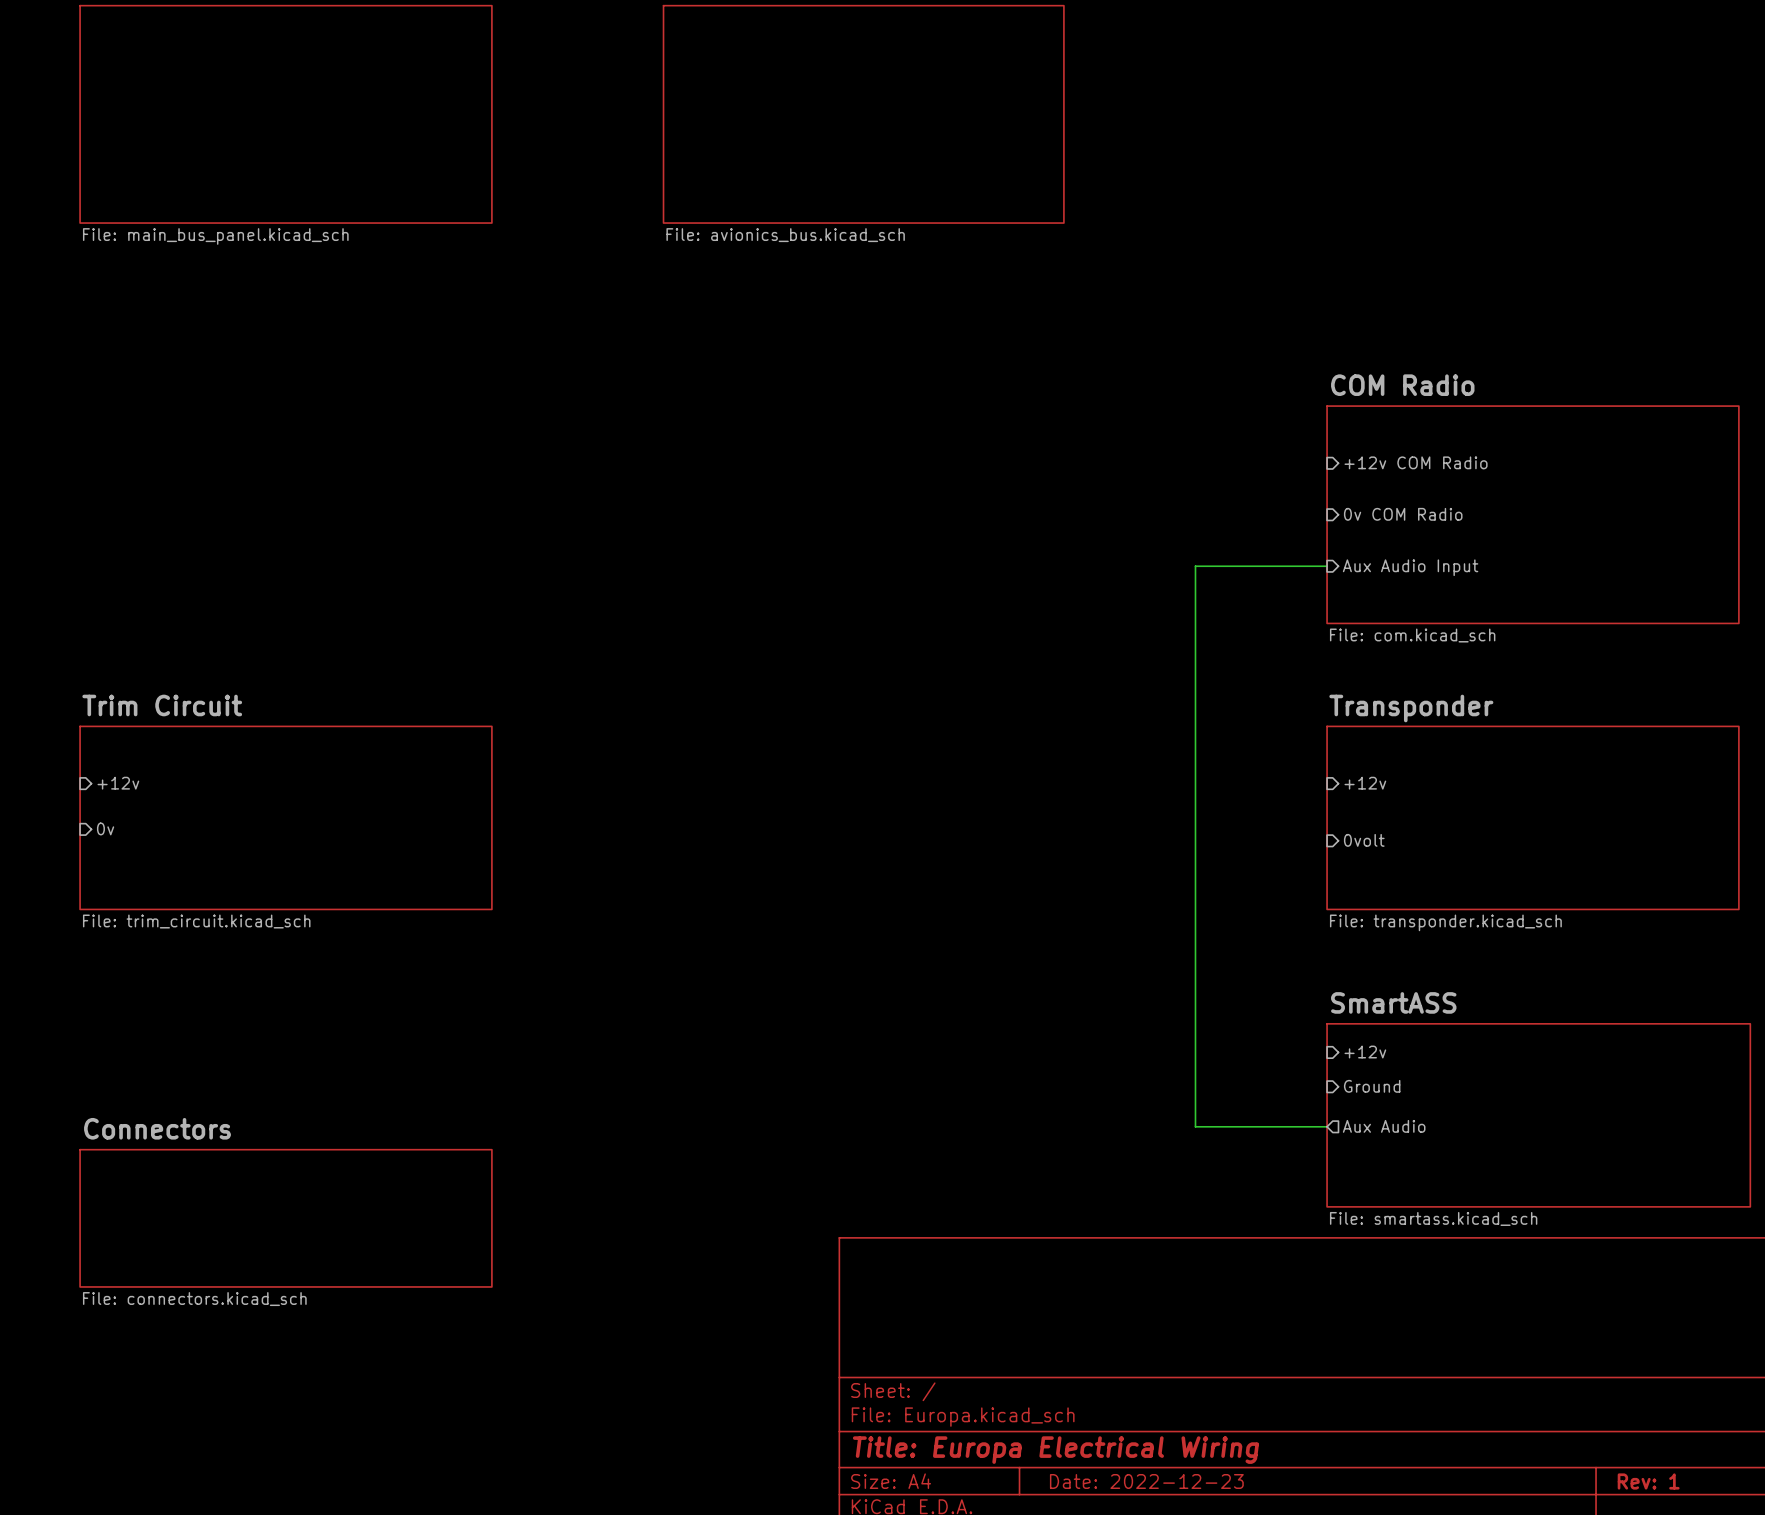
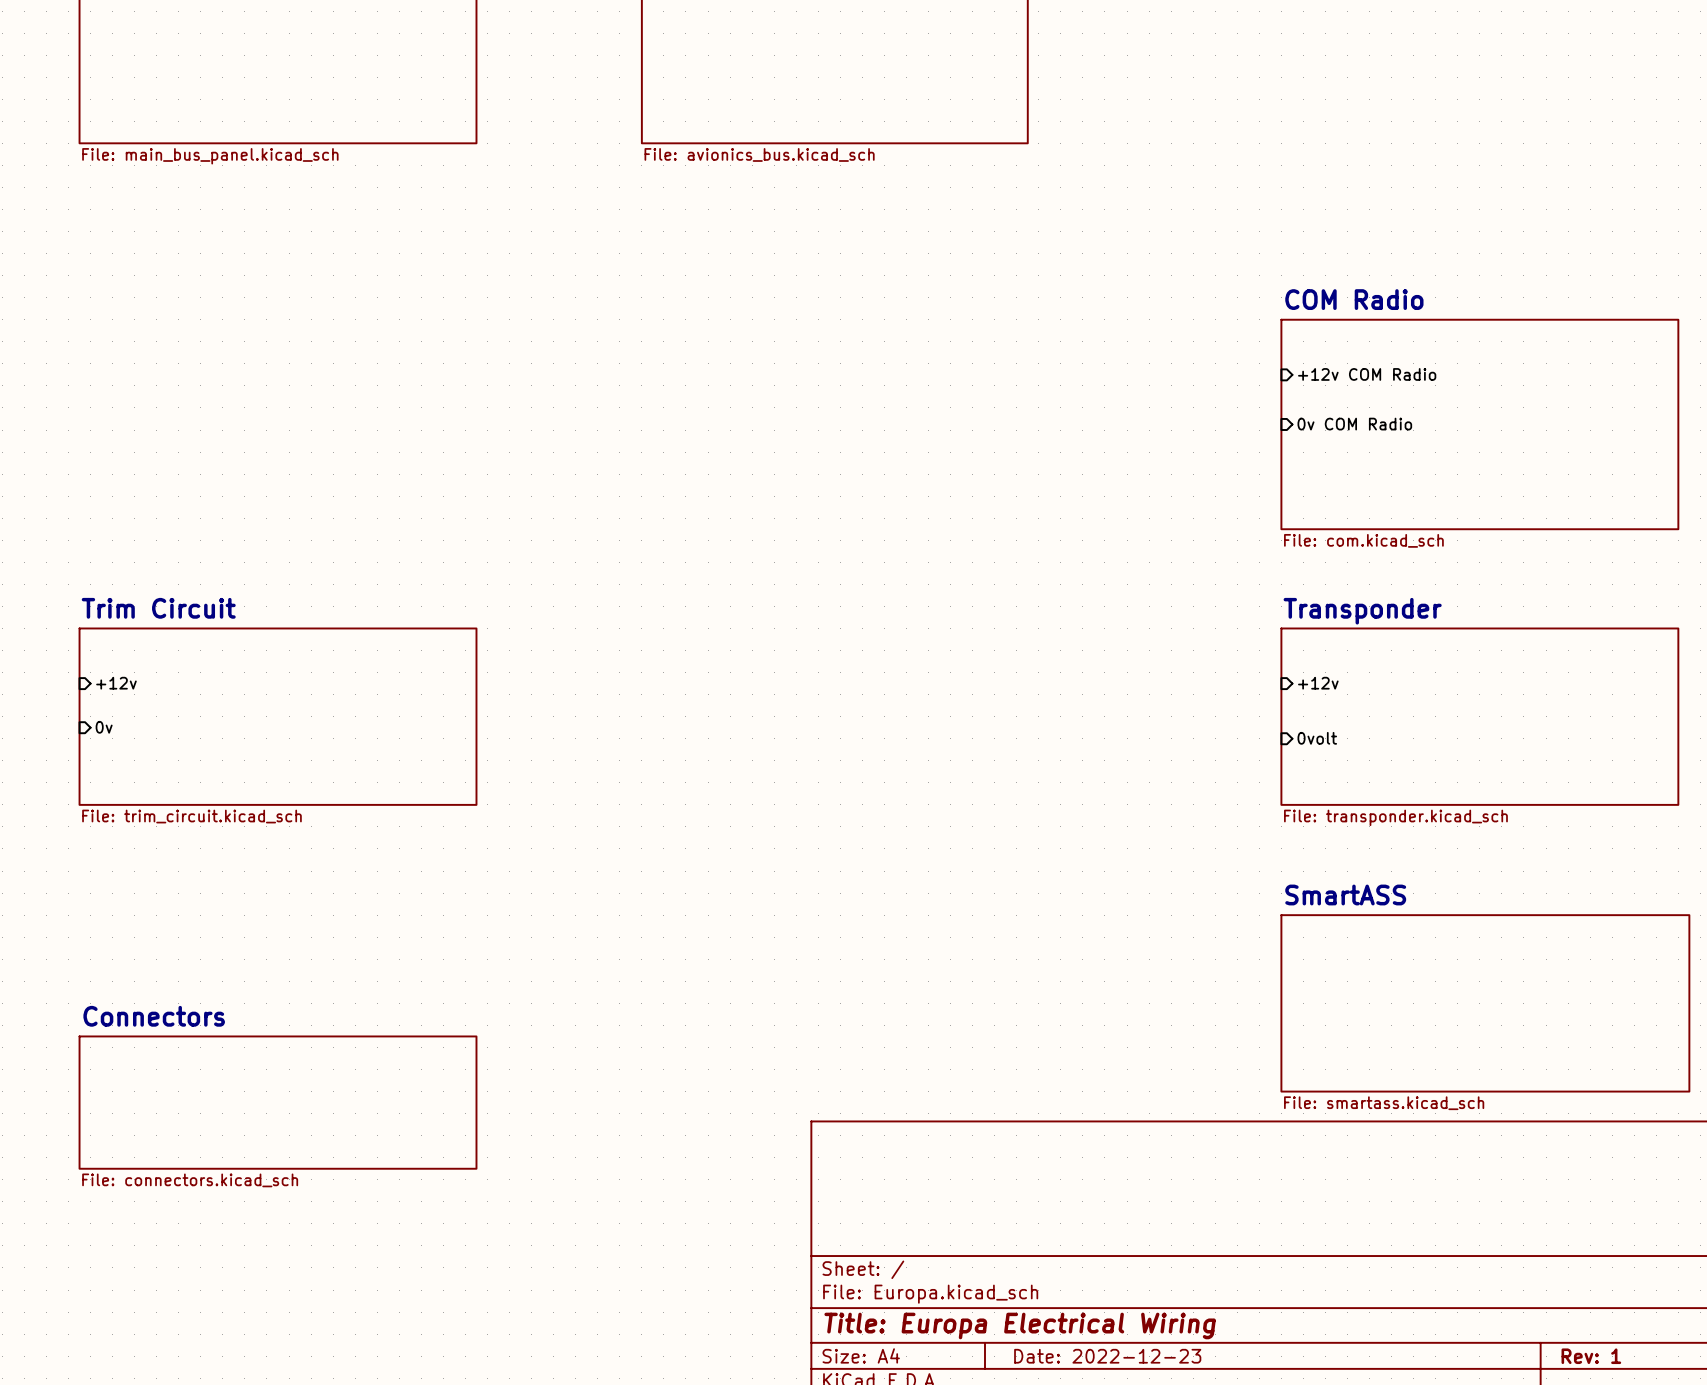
wire: (1327, 566) (1195, 566) (1195, 1126) (1327, 1126) -> none
sheet pin: Aux Audio Input (1410, 567) -> none
sheet pin: +12v (1365, 1052) -> none
sheet pin: Ground (1372, 1086) -> none
sheet pin: Aux Audio (1384, 1126) -> none

